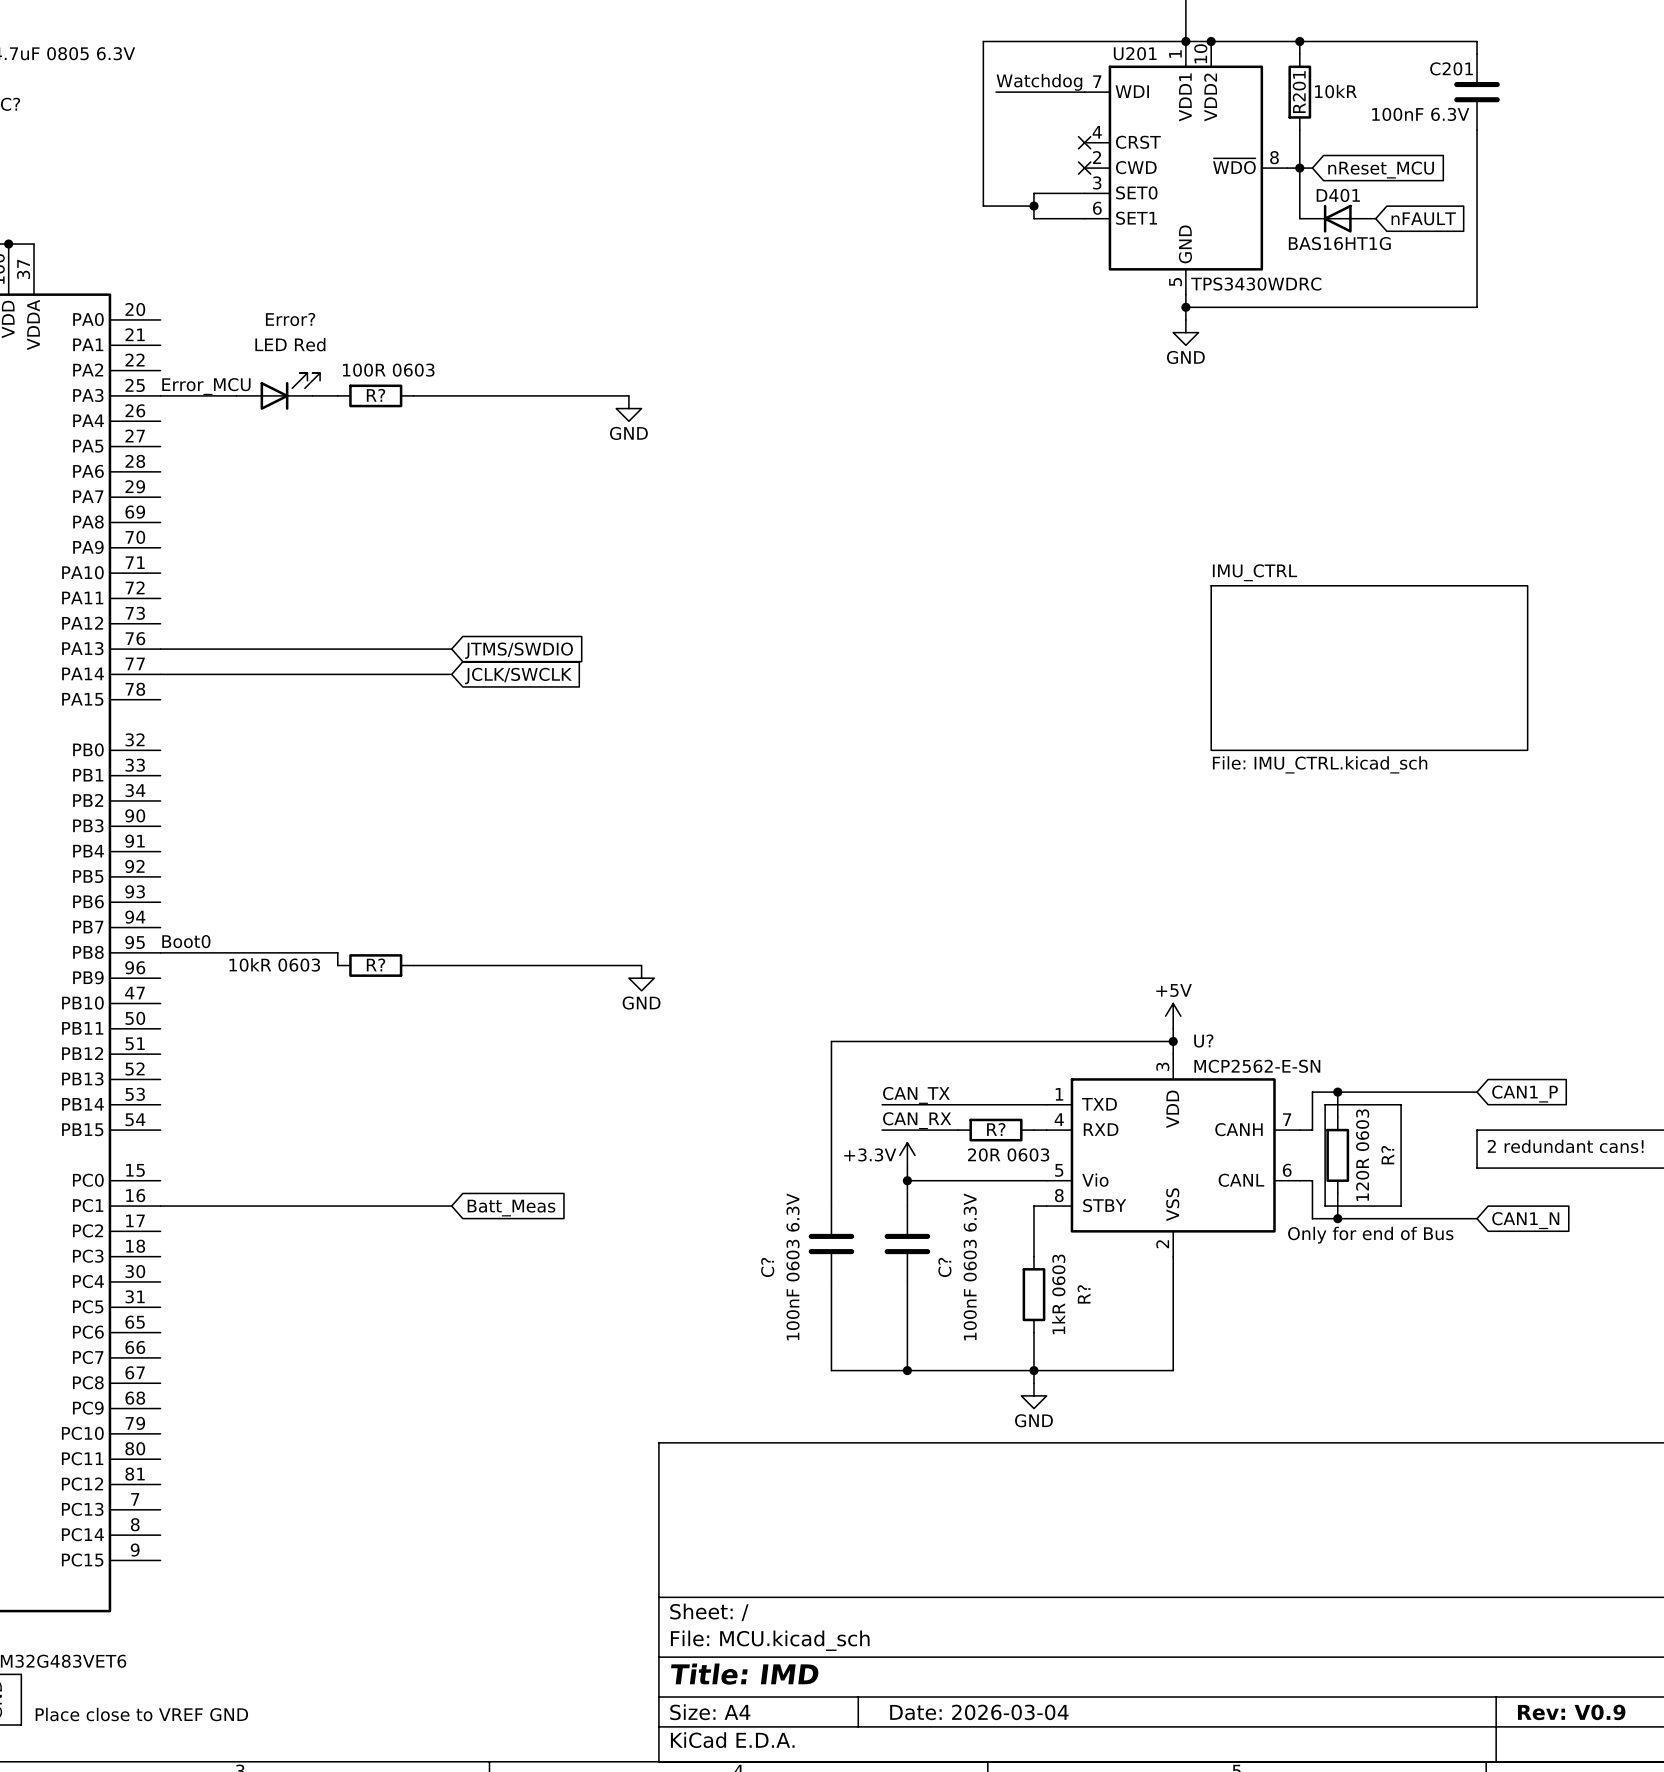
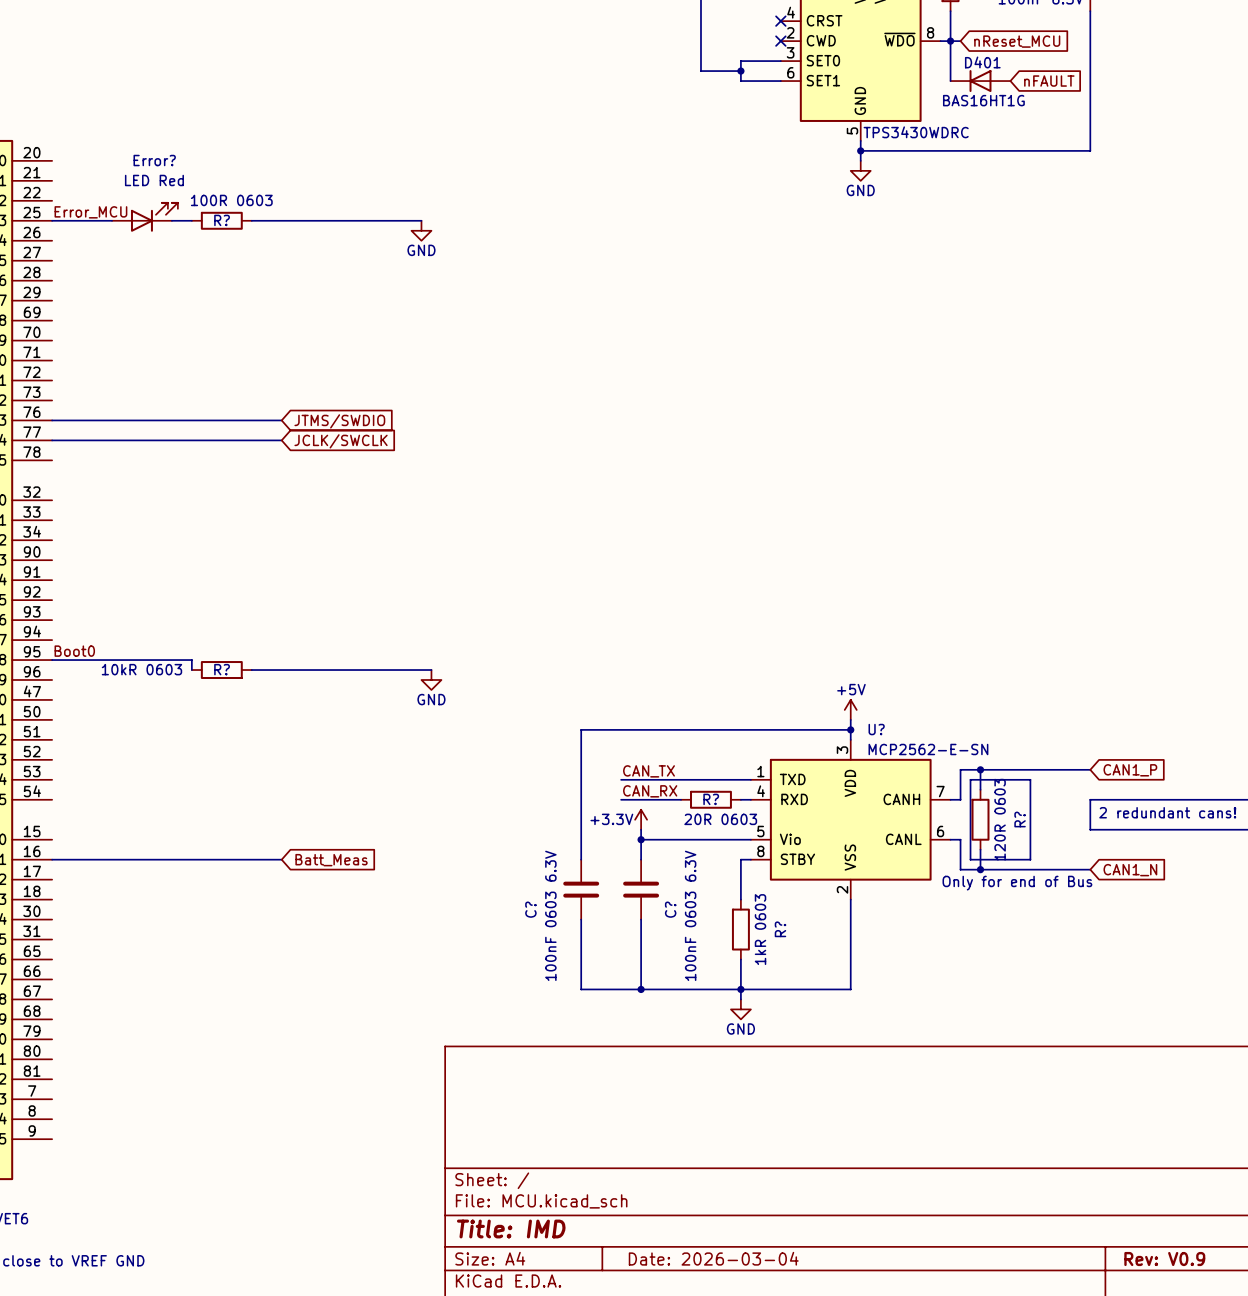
sheet IMU_CTRL: File: IMU_CTRL.kicad_sch (1369, 668) -> none

